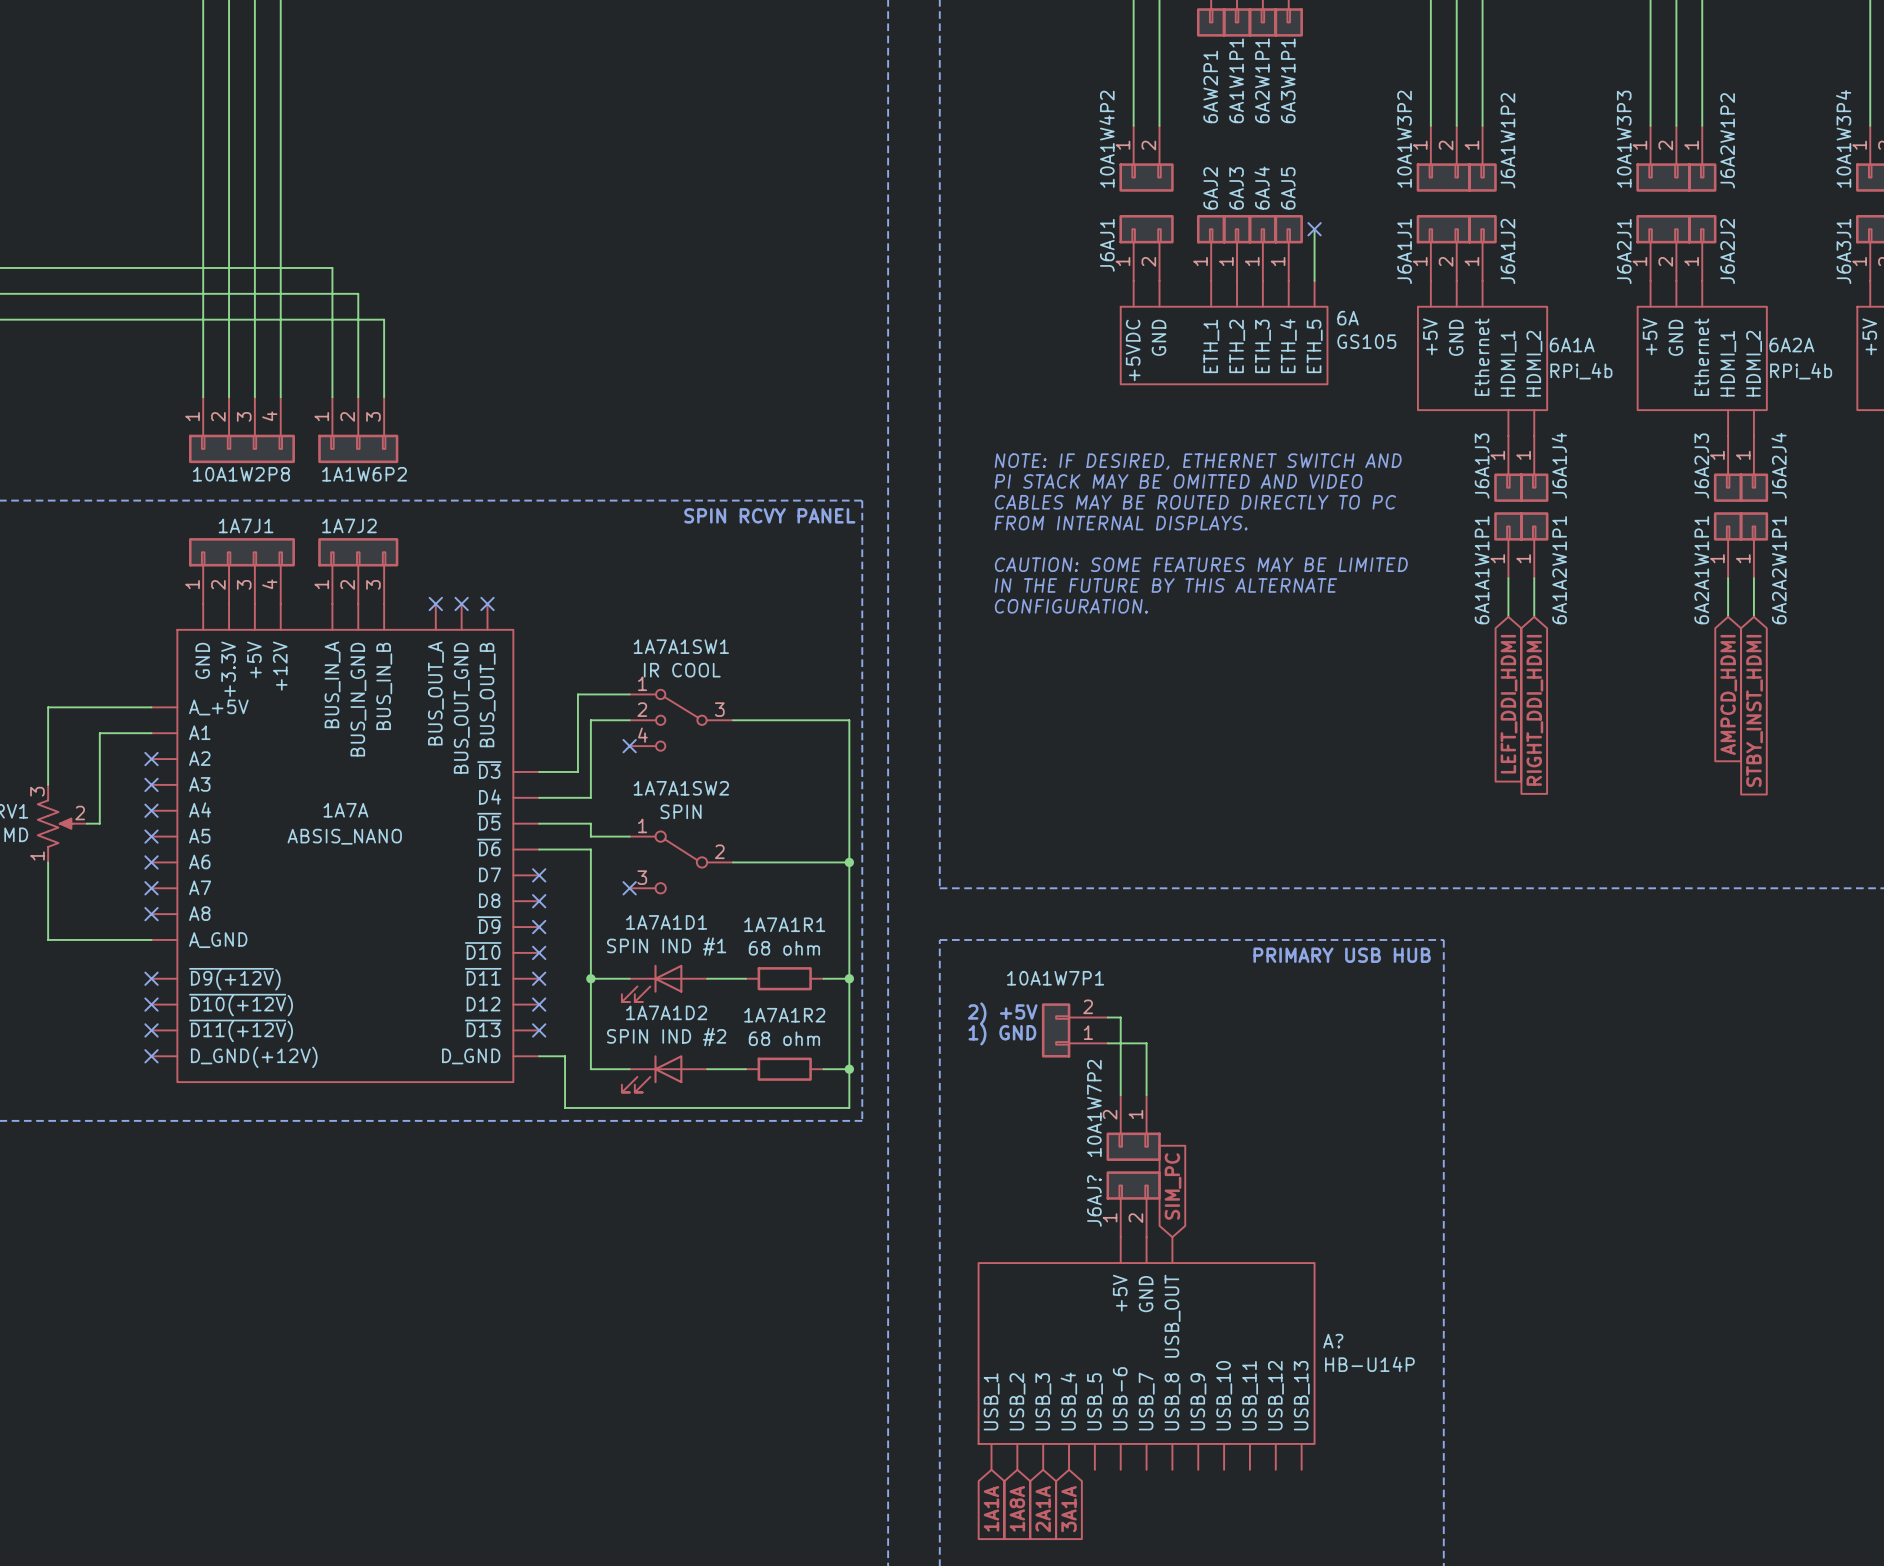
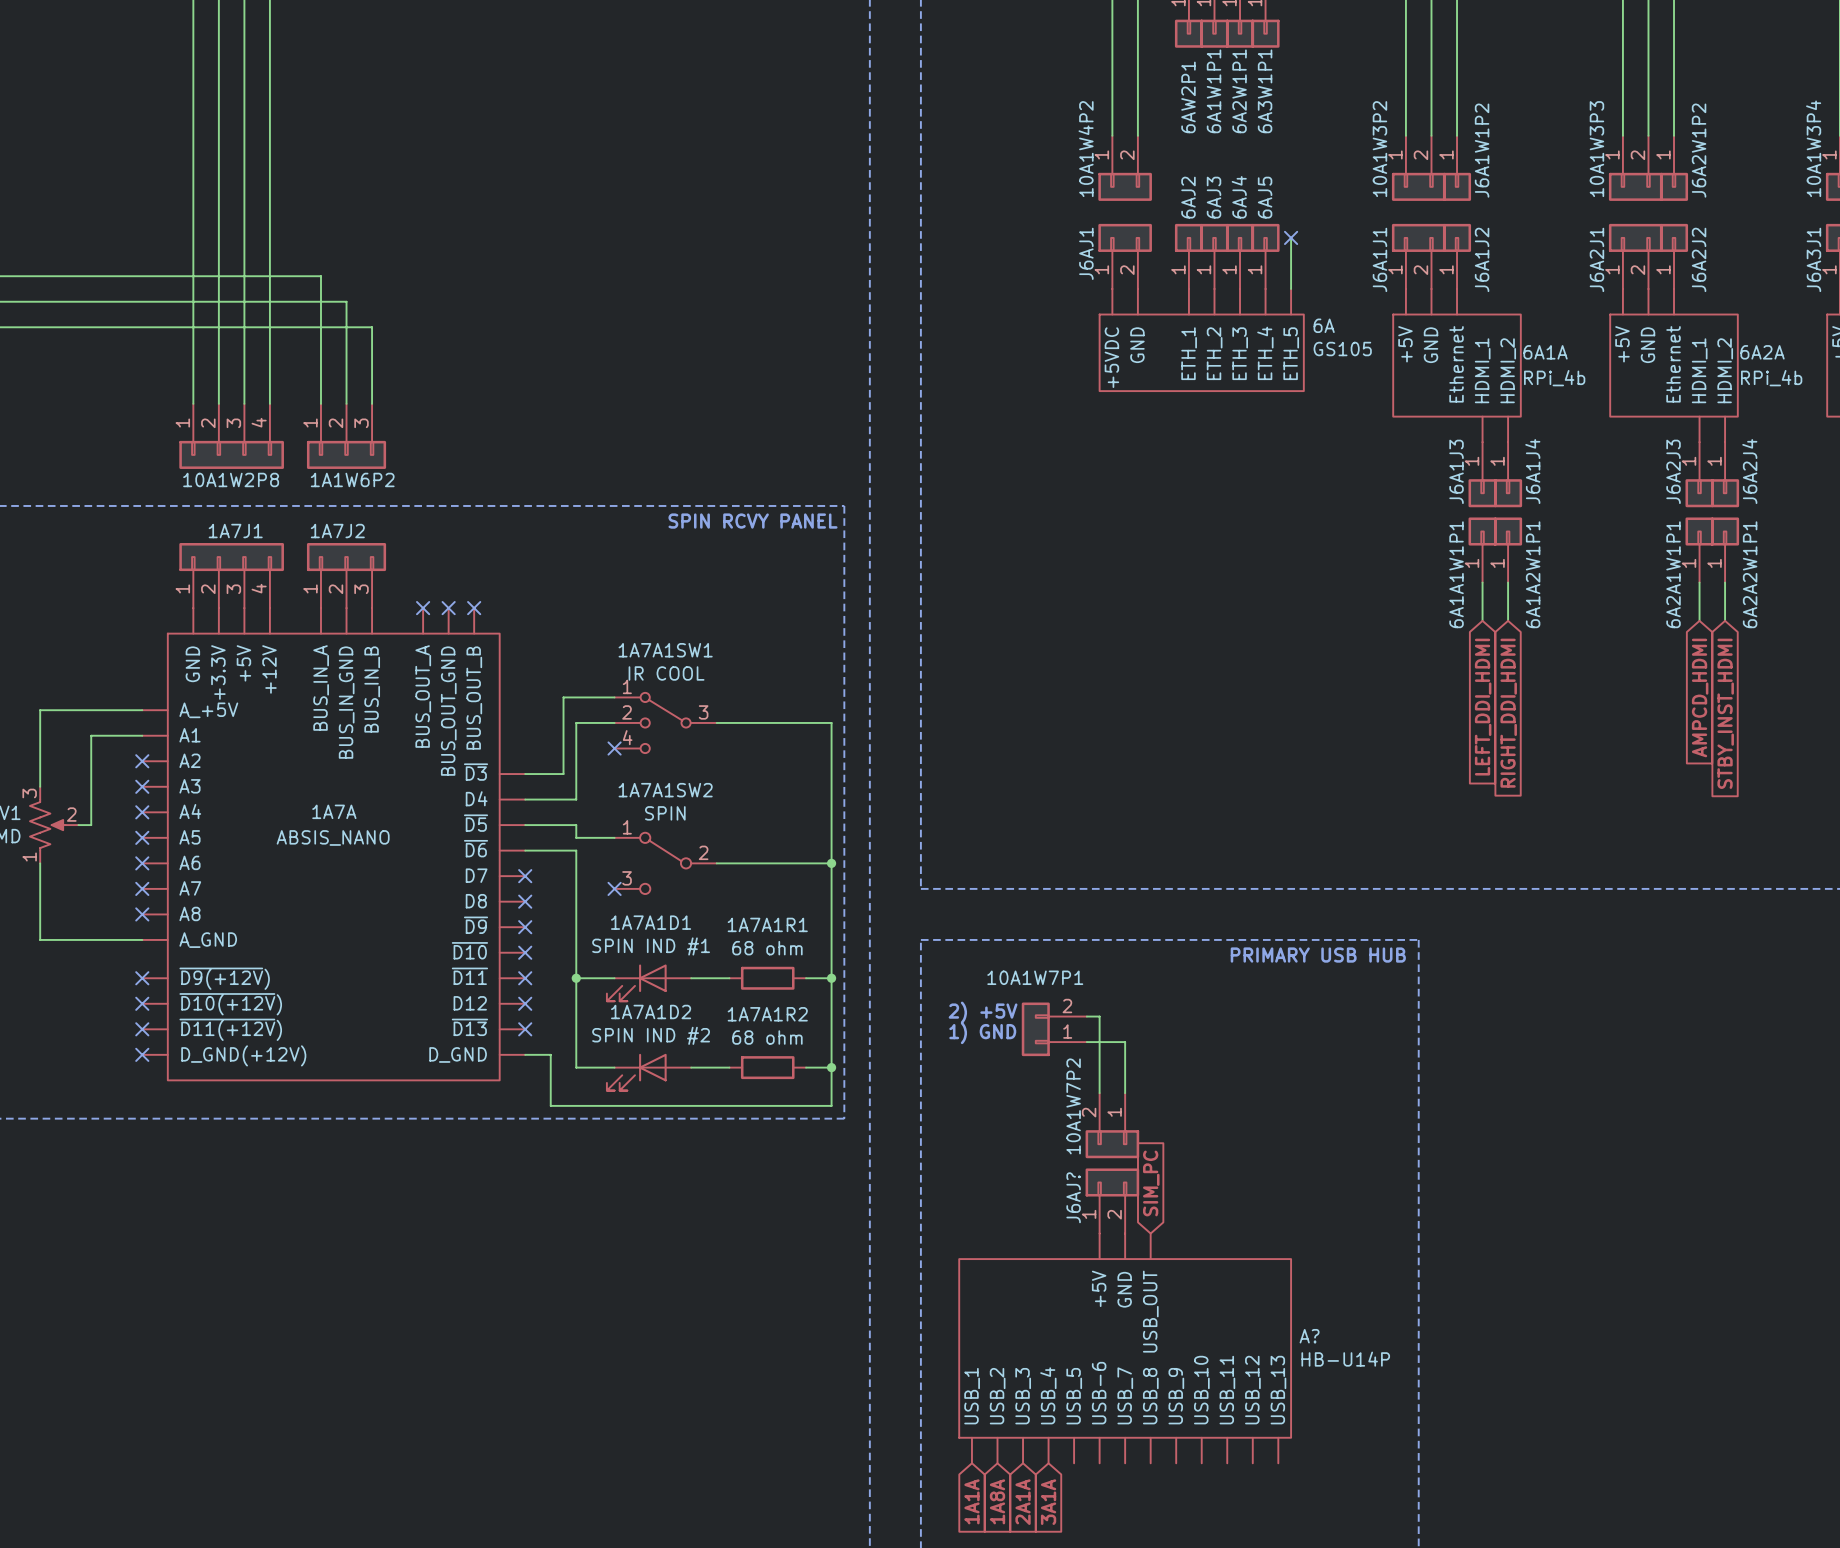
text: NOTE: IF DESIRED, ETHERNET SWITCH AND (1198, 461) -> none
text: PI STACK MAY BE OMITTED AND VIDEO (1178, 481) -> none
text: CABLES MAY BE ROUTED DIRECTLY TO PC (1195, 502) -> none
text: FROM INTERNAL DISPLAYS. (1121, 523) -> none
text: CAUTION: SOME FEATURES MAY BE LIMITED (1201, 564) -> none
text: IN THE FUTURE BY THIS ALTERNATE (1165, 585) -> none
text: CONFIGURATION. (1071, 606) -> none

